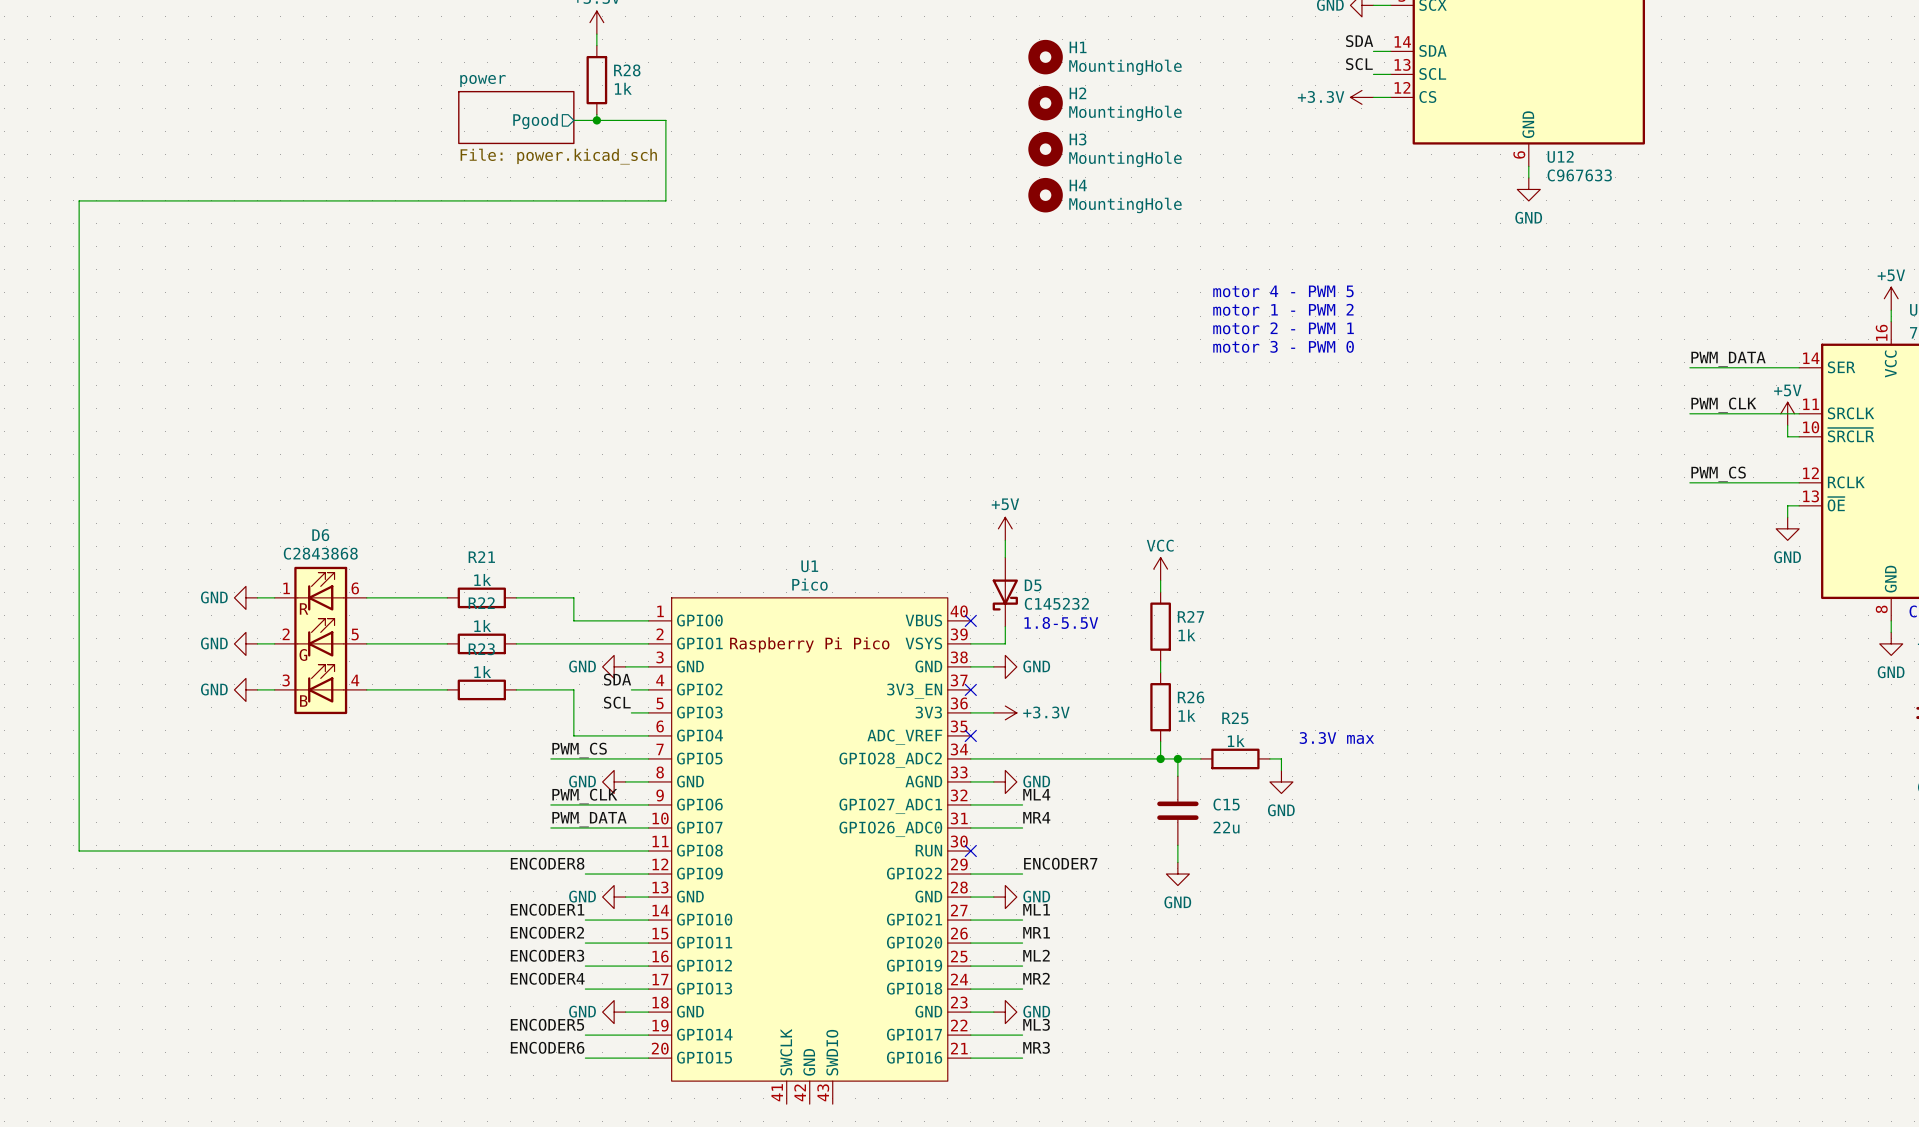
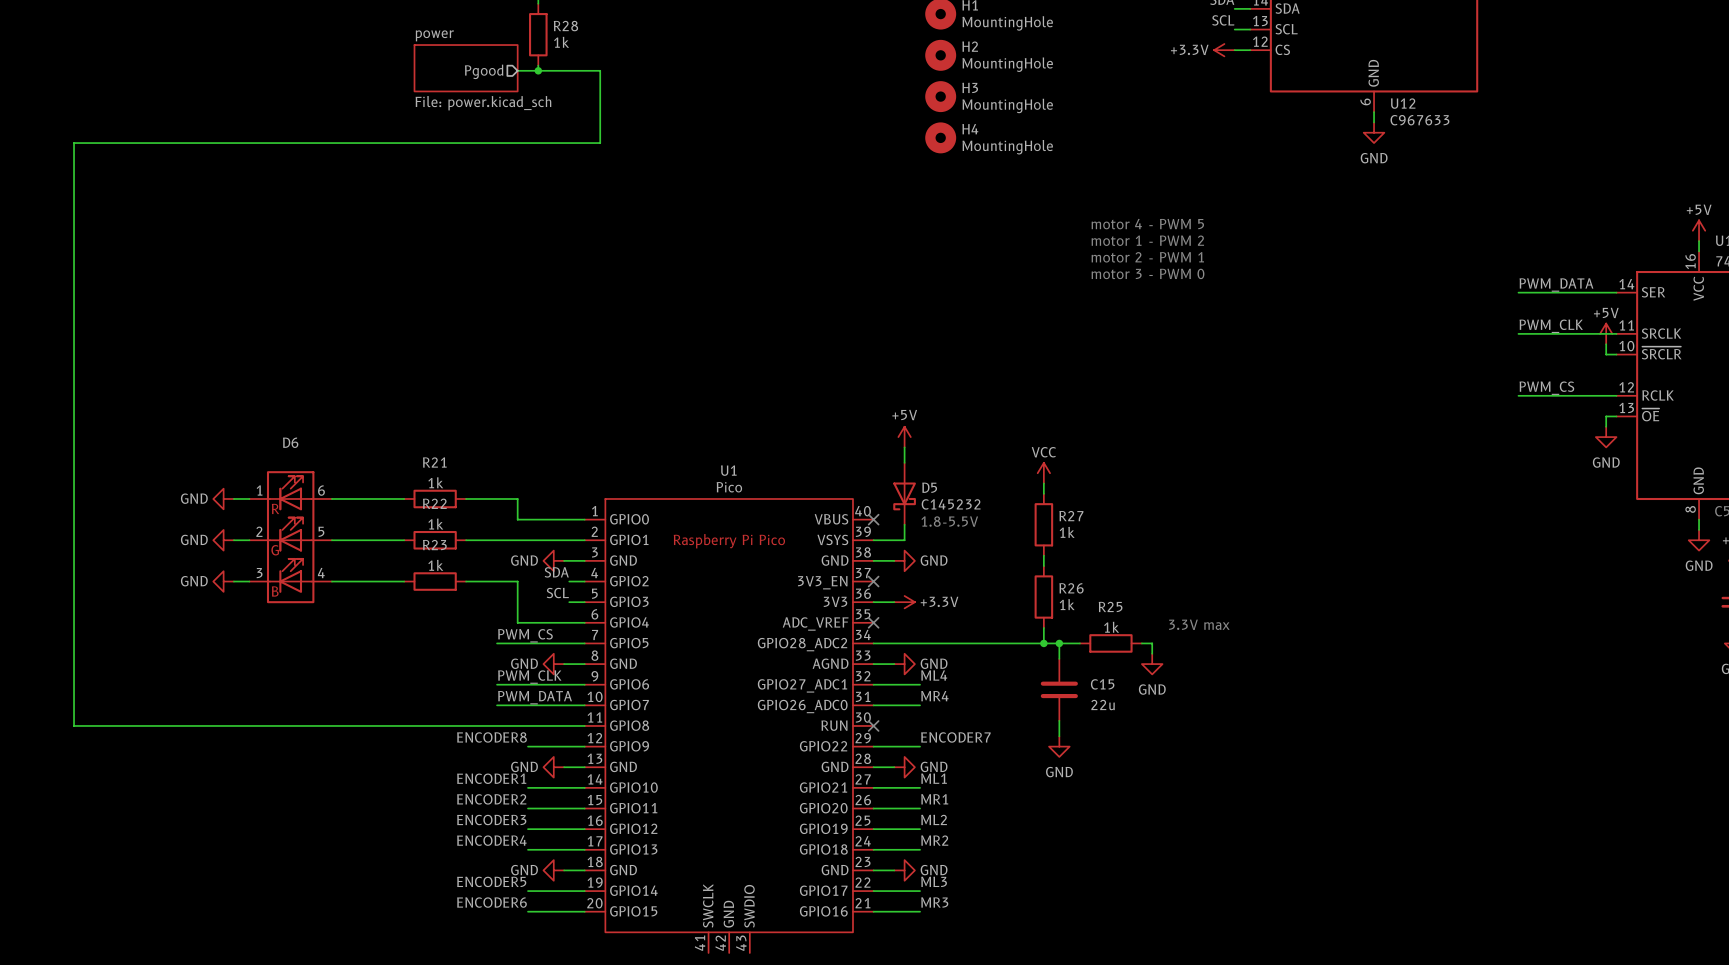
D6 value: C2843868 (320, 553) -> none

